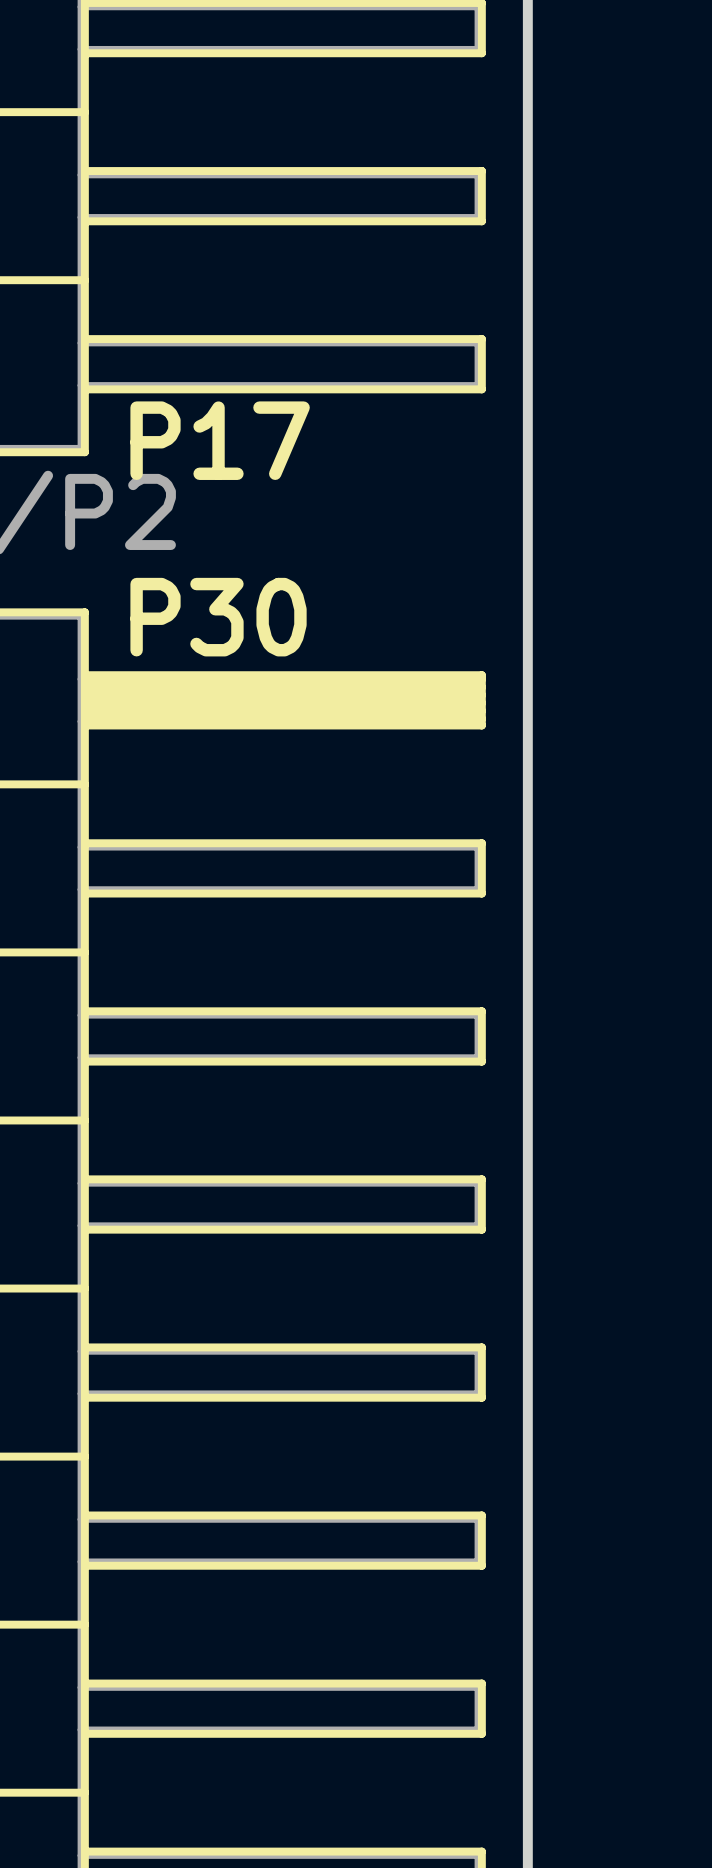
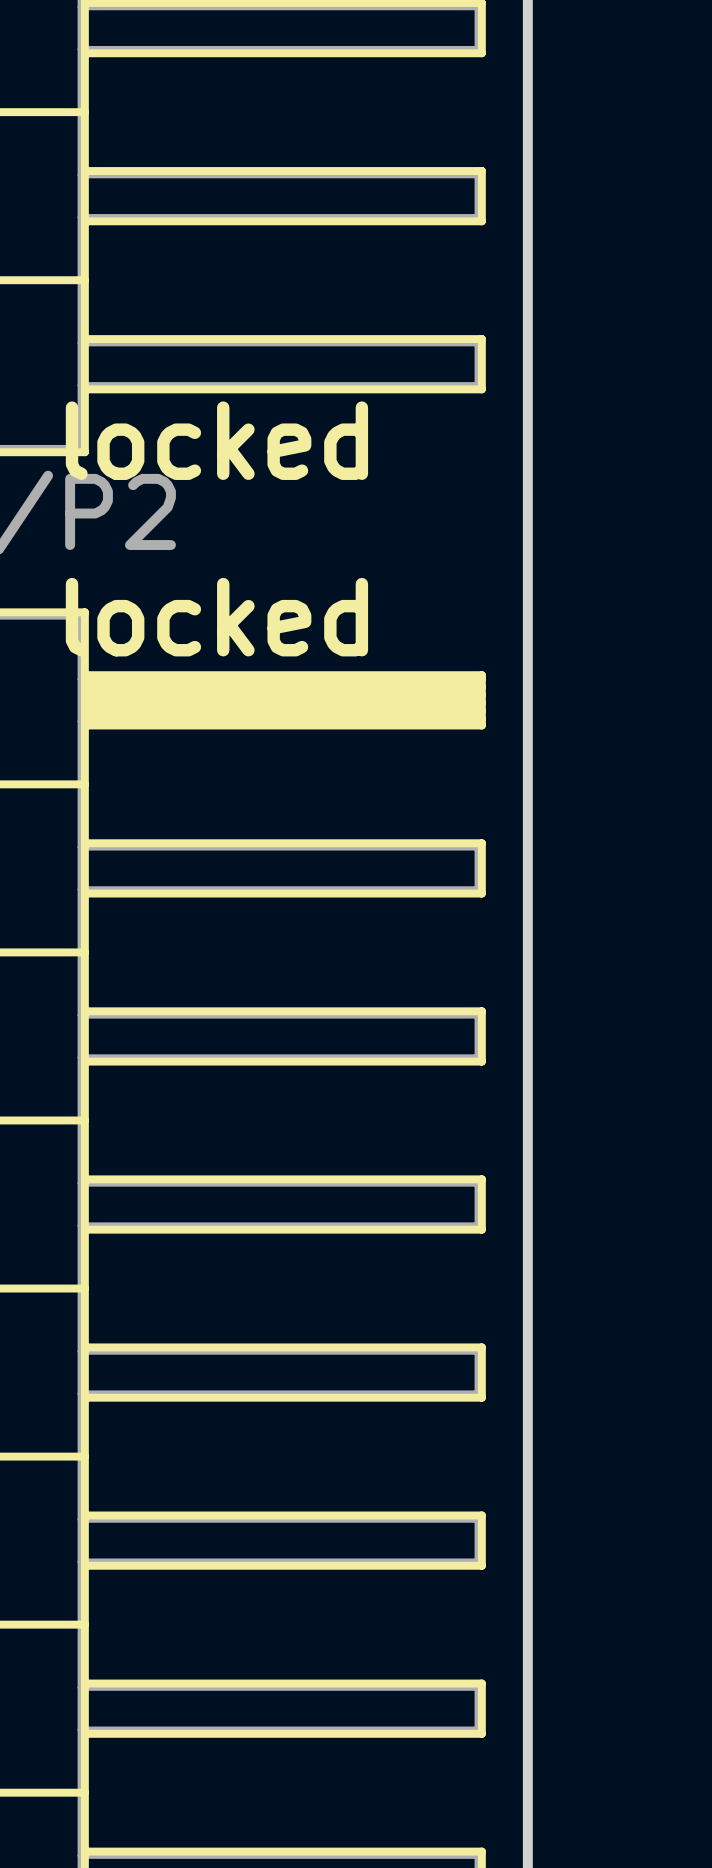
text: P17 (220, 440) -> locked (216, 440)
text: P30 (218, 617) -> locked (216, 617)

